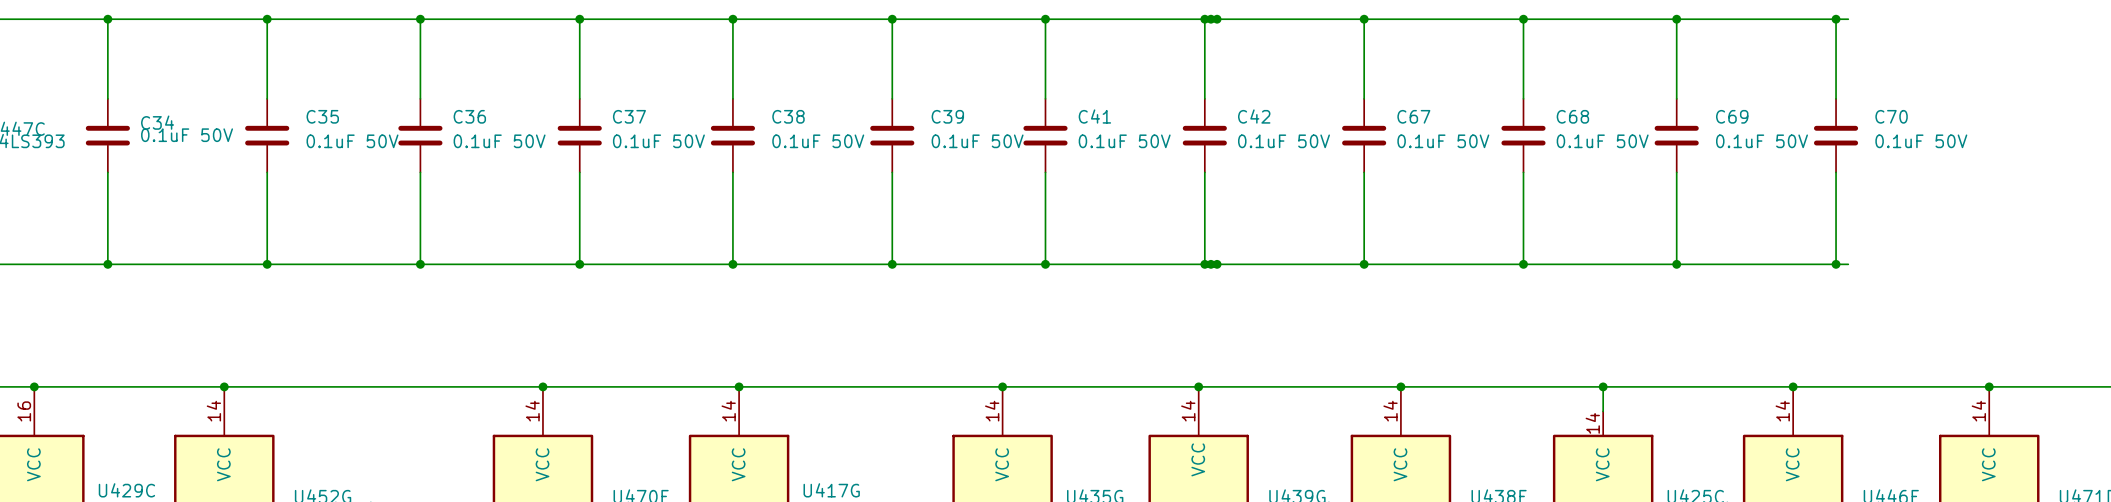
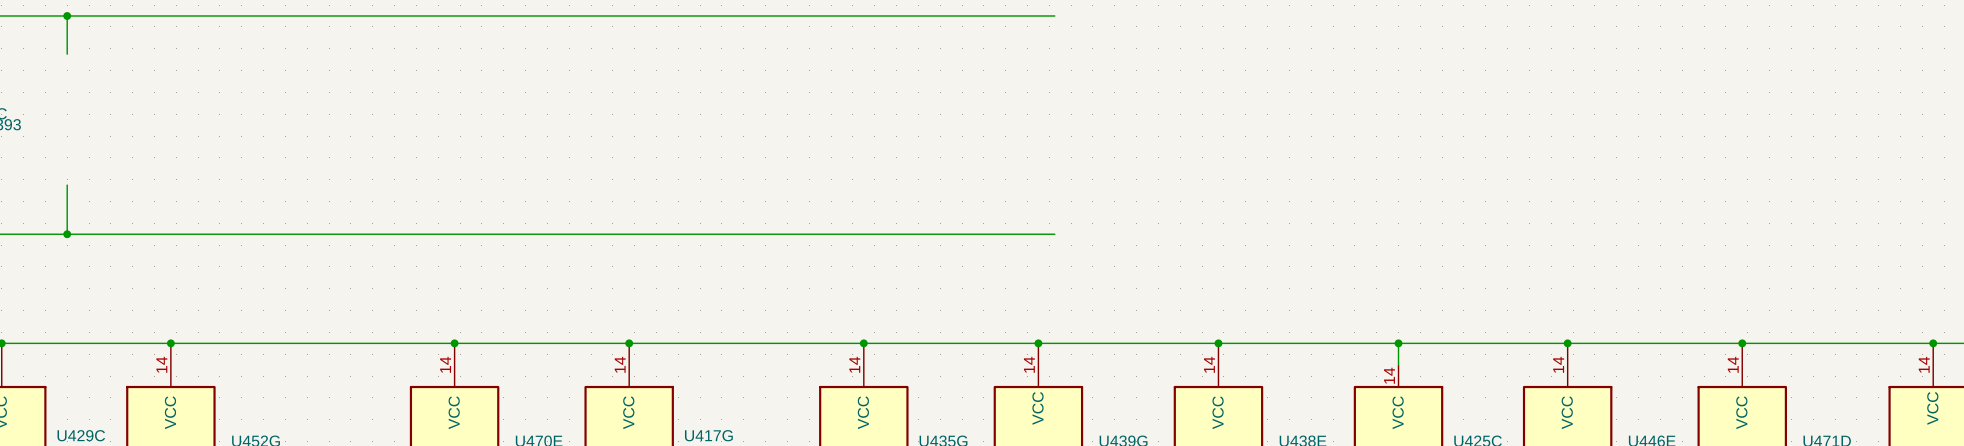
wire: (267, 19) (267, 98) -> none
junction: (267, 19) -> none
wire: (420, 19) (420, 98) -> none
junction: (420, 19) -> none
wire: (579, 19) (579, 98) -> none
junction: (579, 19) -> none
wire: (732, 19) (732, 98) -> none
junction: (732, 19) -> none
wire: (892, 19) (892, 98) -> none
junction: (892, 19) -> none
wire: (1045, 19) (1045, 98) -> none
junction: (1045, 19) -> none
wire: (1204, 19) (1204, 98) -> none
junction: (1204, 19) -> none
junction: (1210, 19) -> none
wire: (1217, 19) (1848, 19) -> none
junction: (1217, 19) -> none
wire: (1364, 19) (1364, 98) -> none
junction: (1364, 19) -> none
wire: (1523, 19) (1523, 98) -> none
junction: (1523, 19) -> none
wire: (1676, 19) (1676, 98) -> none
junction: (1676, 19) -> none
wire: (1836, 19) (1836, 98) -> none
junction: (1836, 19) -> none
wire: (107, 62) (107, 98) -> none
C34: 0.1uF 50V (107, 135) -> none
C35: 0.1uF 50V (267, 135) -> none
C36: 0.1uF 50V (420, 135) -> none
C37: 0.1uF 50V (579, 135) -> none
C38: 0.1uF 50V (732, 135) -> none
C39: 0.1uF 50V (892, 135) -> none
C41: 0.1uF 50V (1045, 135) -> none
C42: 0.1uF 50V (1204, 135) -> none
C67: 0.1uF 50V (1364, 135) -> none
C68: 0.1uF 50V (1523, 135) -> none
C69: 0.1uF 50V (1676, 135) -> none
C70: 0.1uF 50V (1836, 135) -> none
wire: (107, 172) (107, 209) -> none
wire: (267, 172) (267, 264) -> none
wire: (420, 172) (420, 264) -> none
wire: (579, 172) (579, 264) -> none
wire: (732, 172) (732, 264) -> none
wire: (892, 172) (892, 264) -> none
wire: (1045, 172) (1045, 264) -> none
wire: (1204, 172) (1204, 264) -> none
wire: (1364, 172) (1364, 264) -> none
wire: (1523, 172) (1523, 264) -> none
wire: (1676, 172) (1676, 264) -> none
wire: (1836, 172) (1836, 264) -> none
junction: (267, 264) -> none
junction: (420, 264) -> none
junction: (579, 264) -> none
junction: (732, 264) -> none
junction: (892, 264) -> none
junction: (1045, 264) -> none
junction: (1204, 264) -> none
junction: (1210, 264) -> none
wire: (1217, 264) (1848, 264) -> none
junction: (1217, 264) -> none
junction: (1364, 264) -> none
junction: (1523, 264) -> none
junction: (1676, 264) -> none
junction: (1836, 264) -> none

